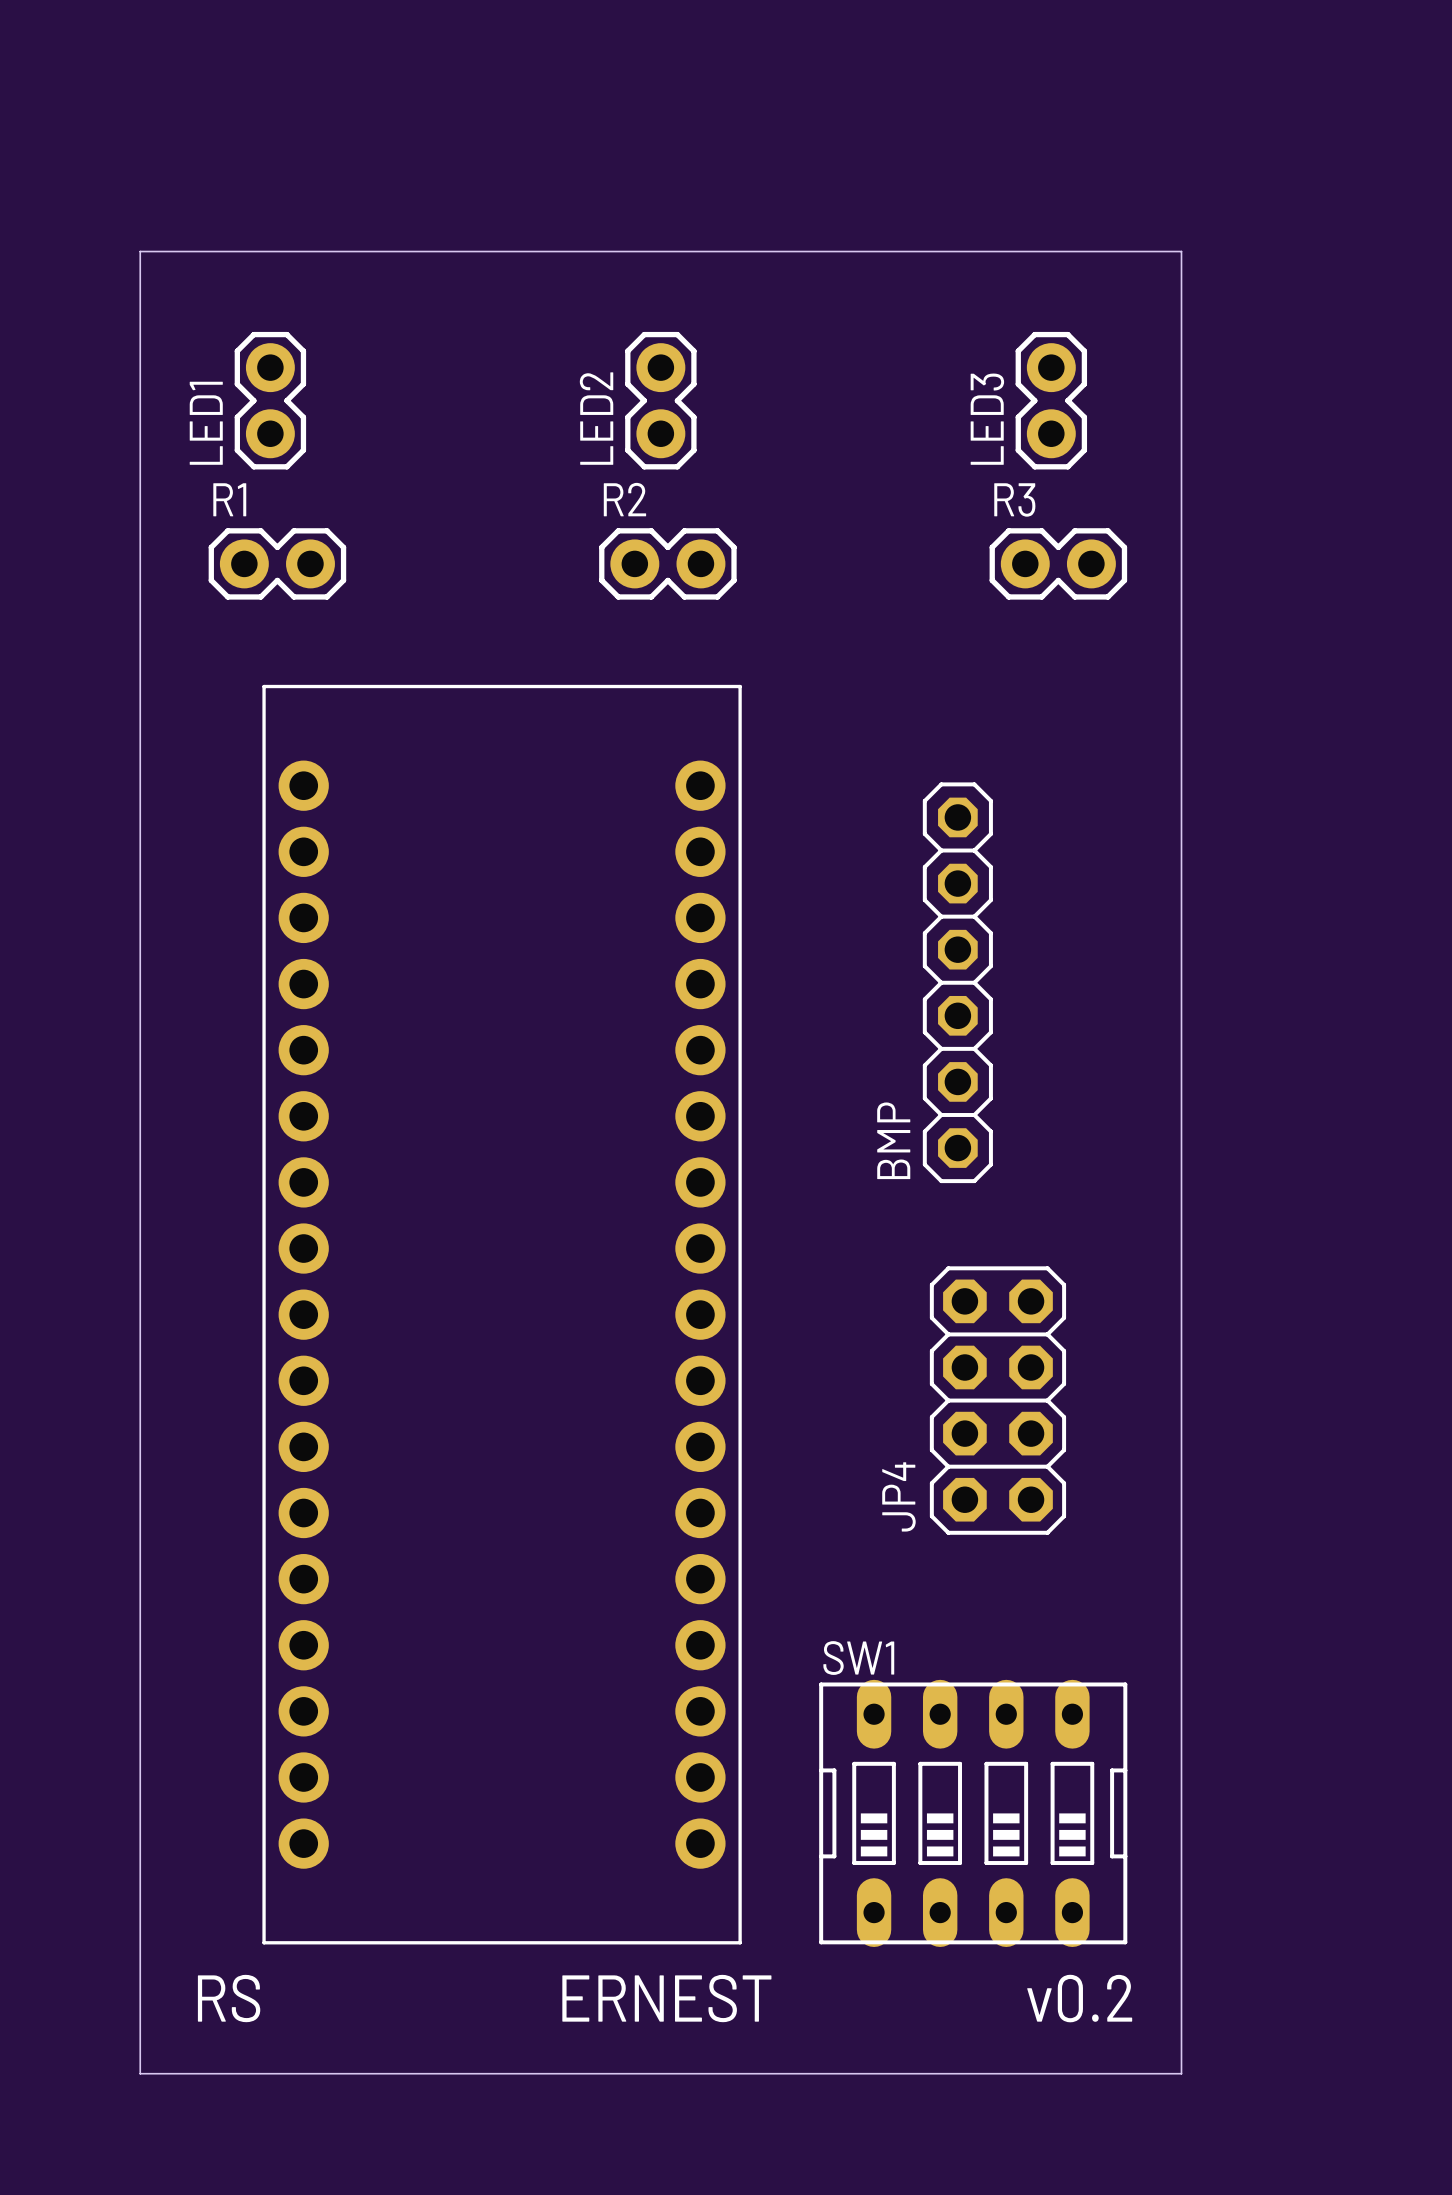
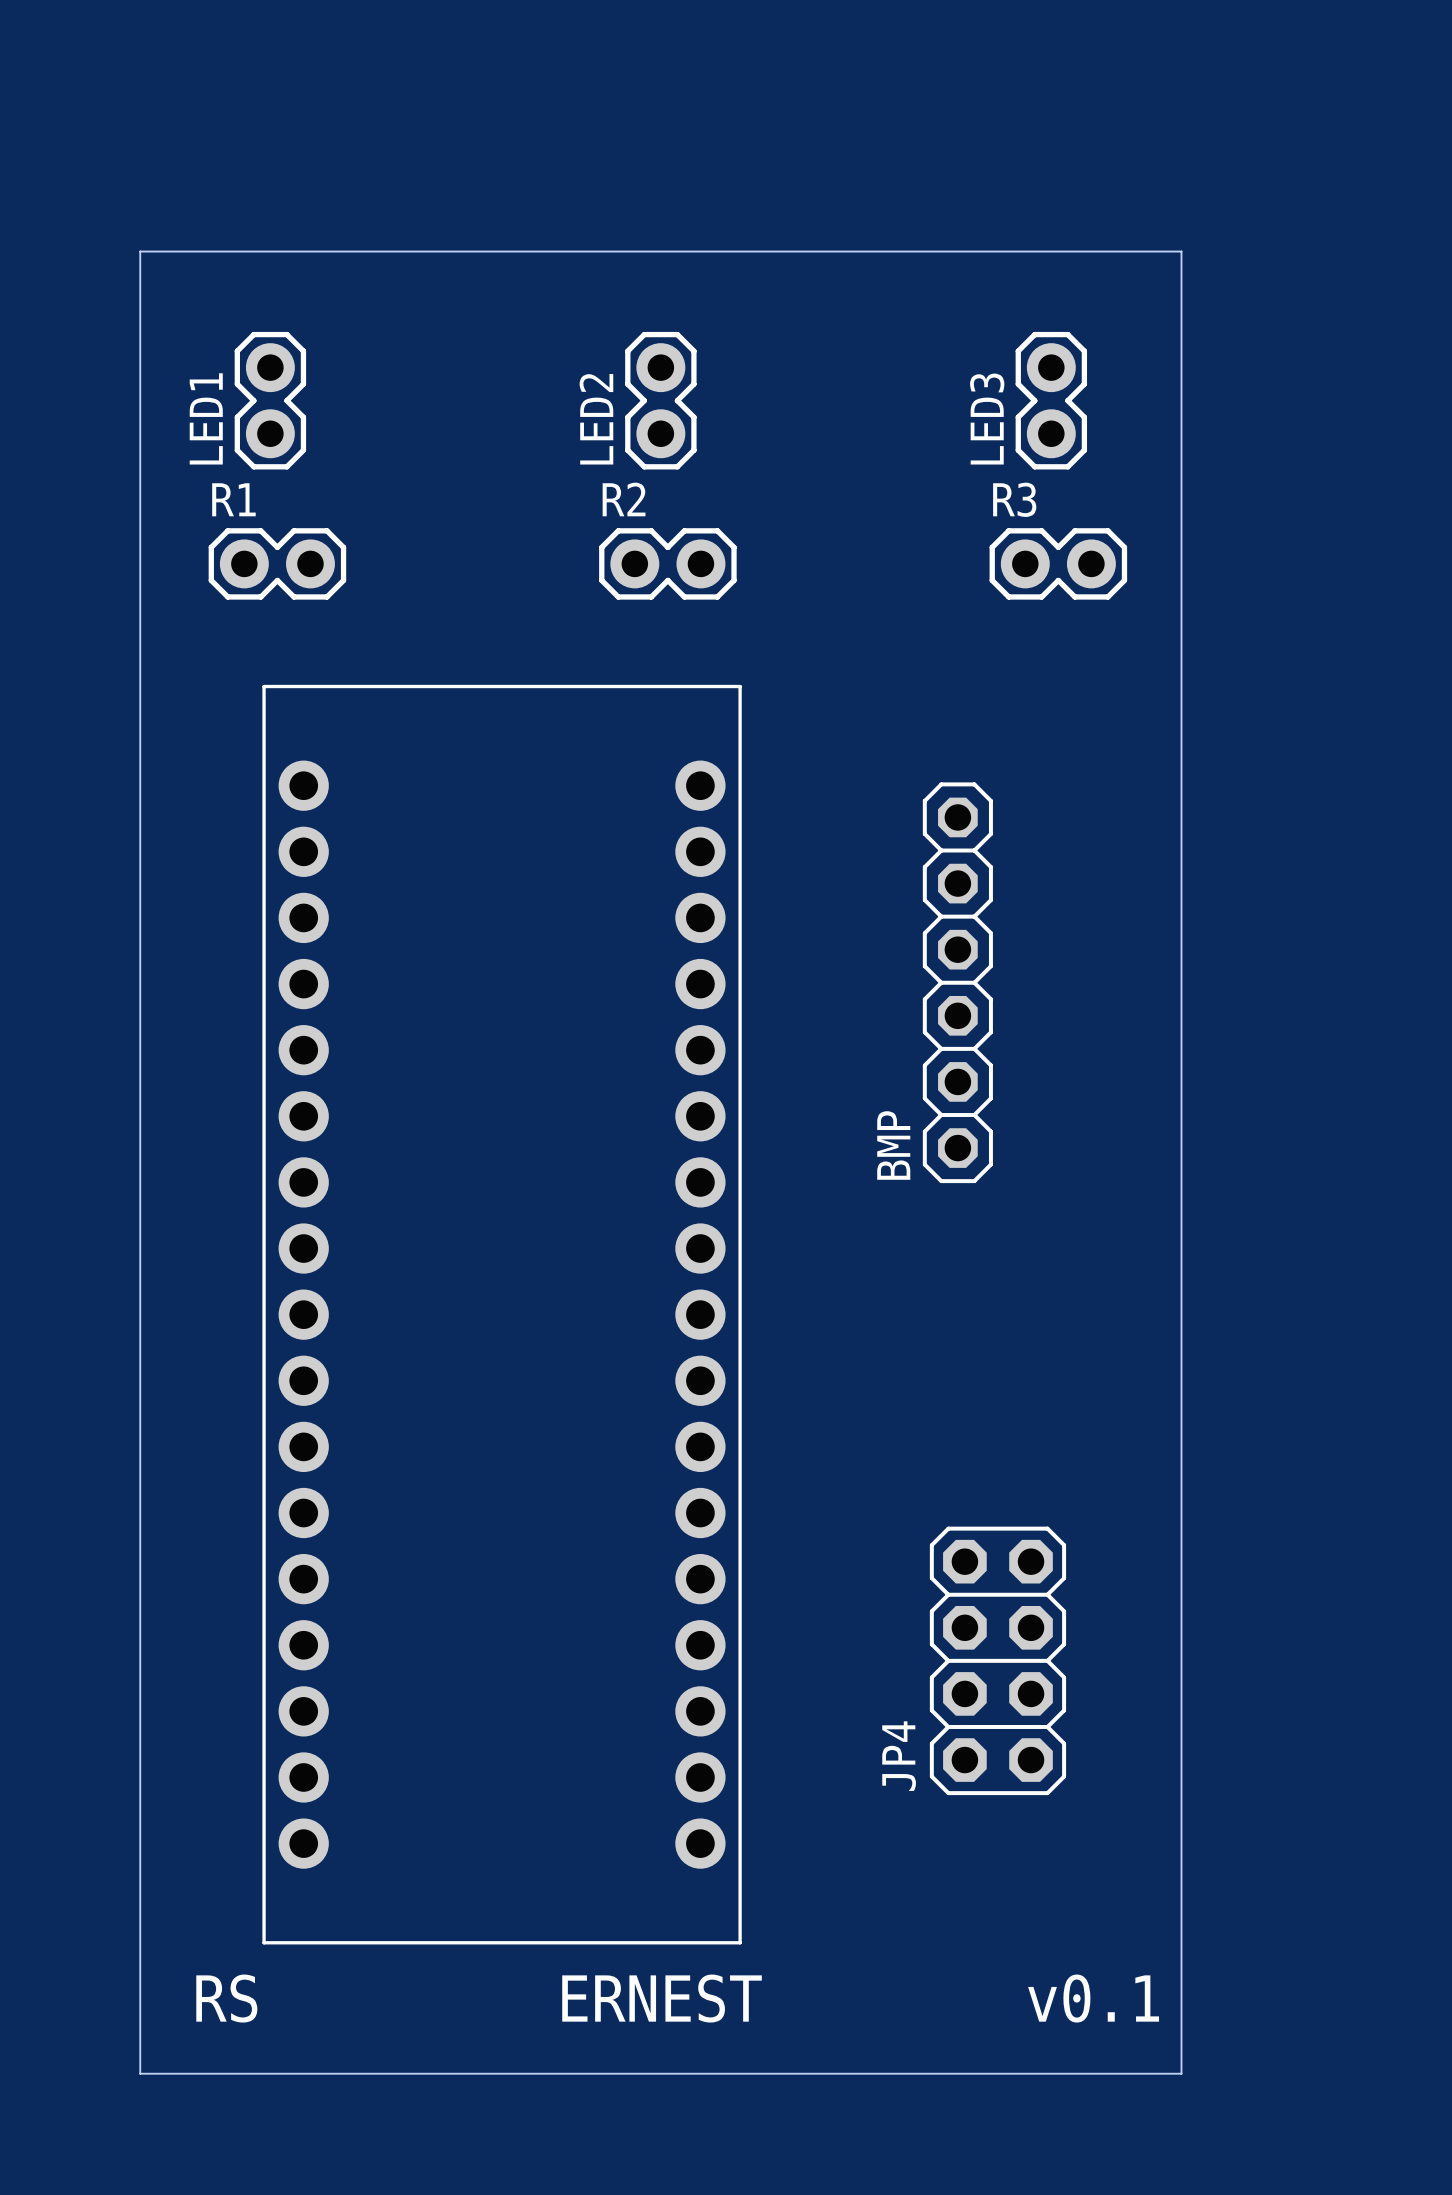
JP4 position: (997, 1400) -> (997, 1660)
SW1: (973, 1813) -> none
text: v0.2 (1079, 1998) -> v0.1 (1093, 1998)

